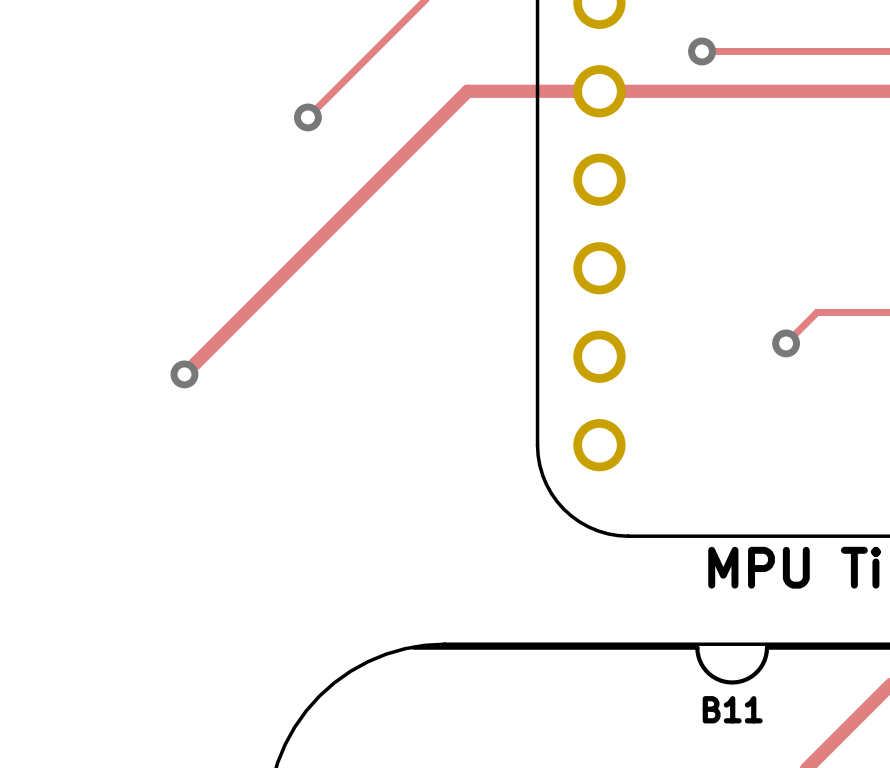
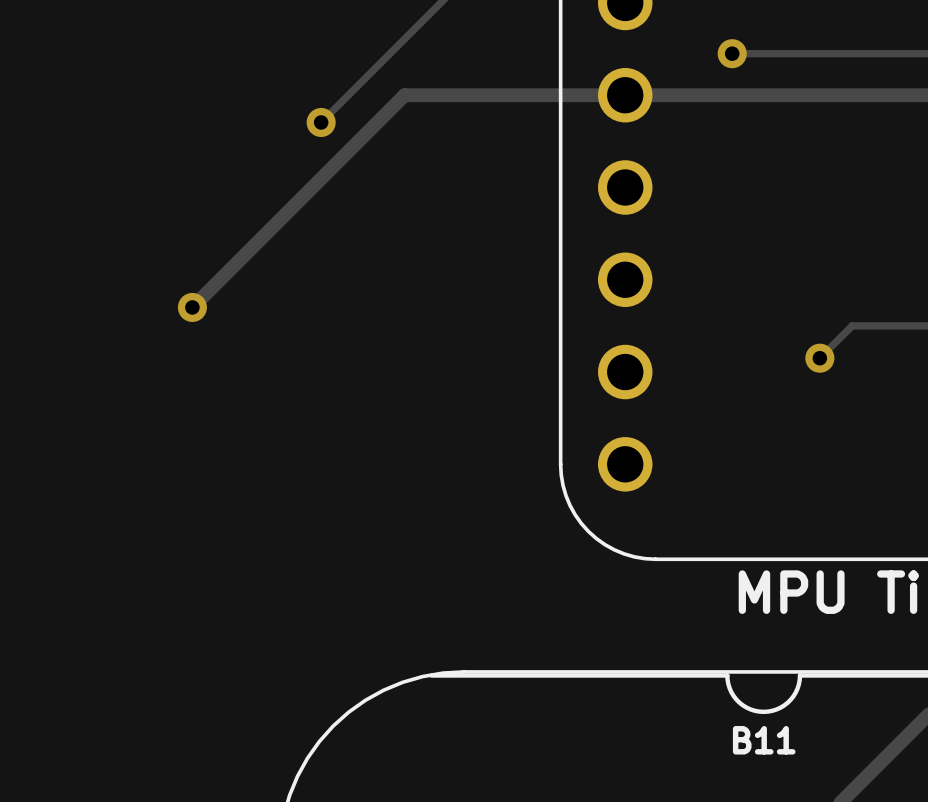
track: (467, 91) (184, 374) -> (487, 95) (404, 95) (192, 307)
via position: (184, 374) -> (192, 307)

